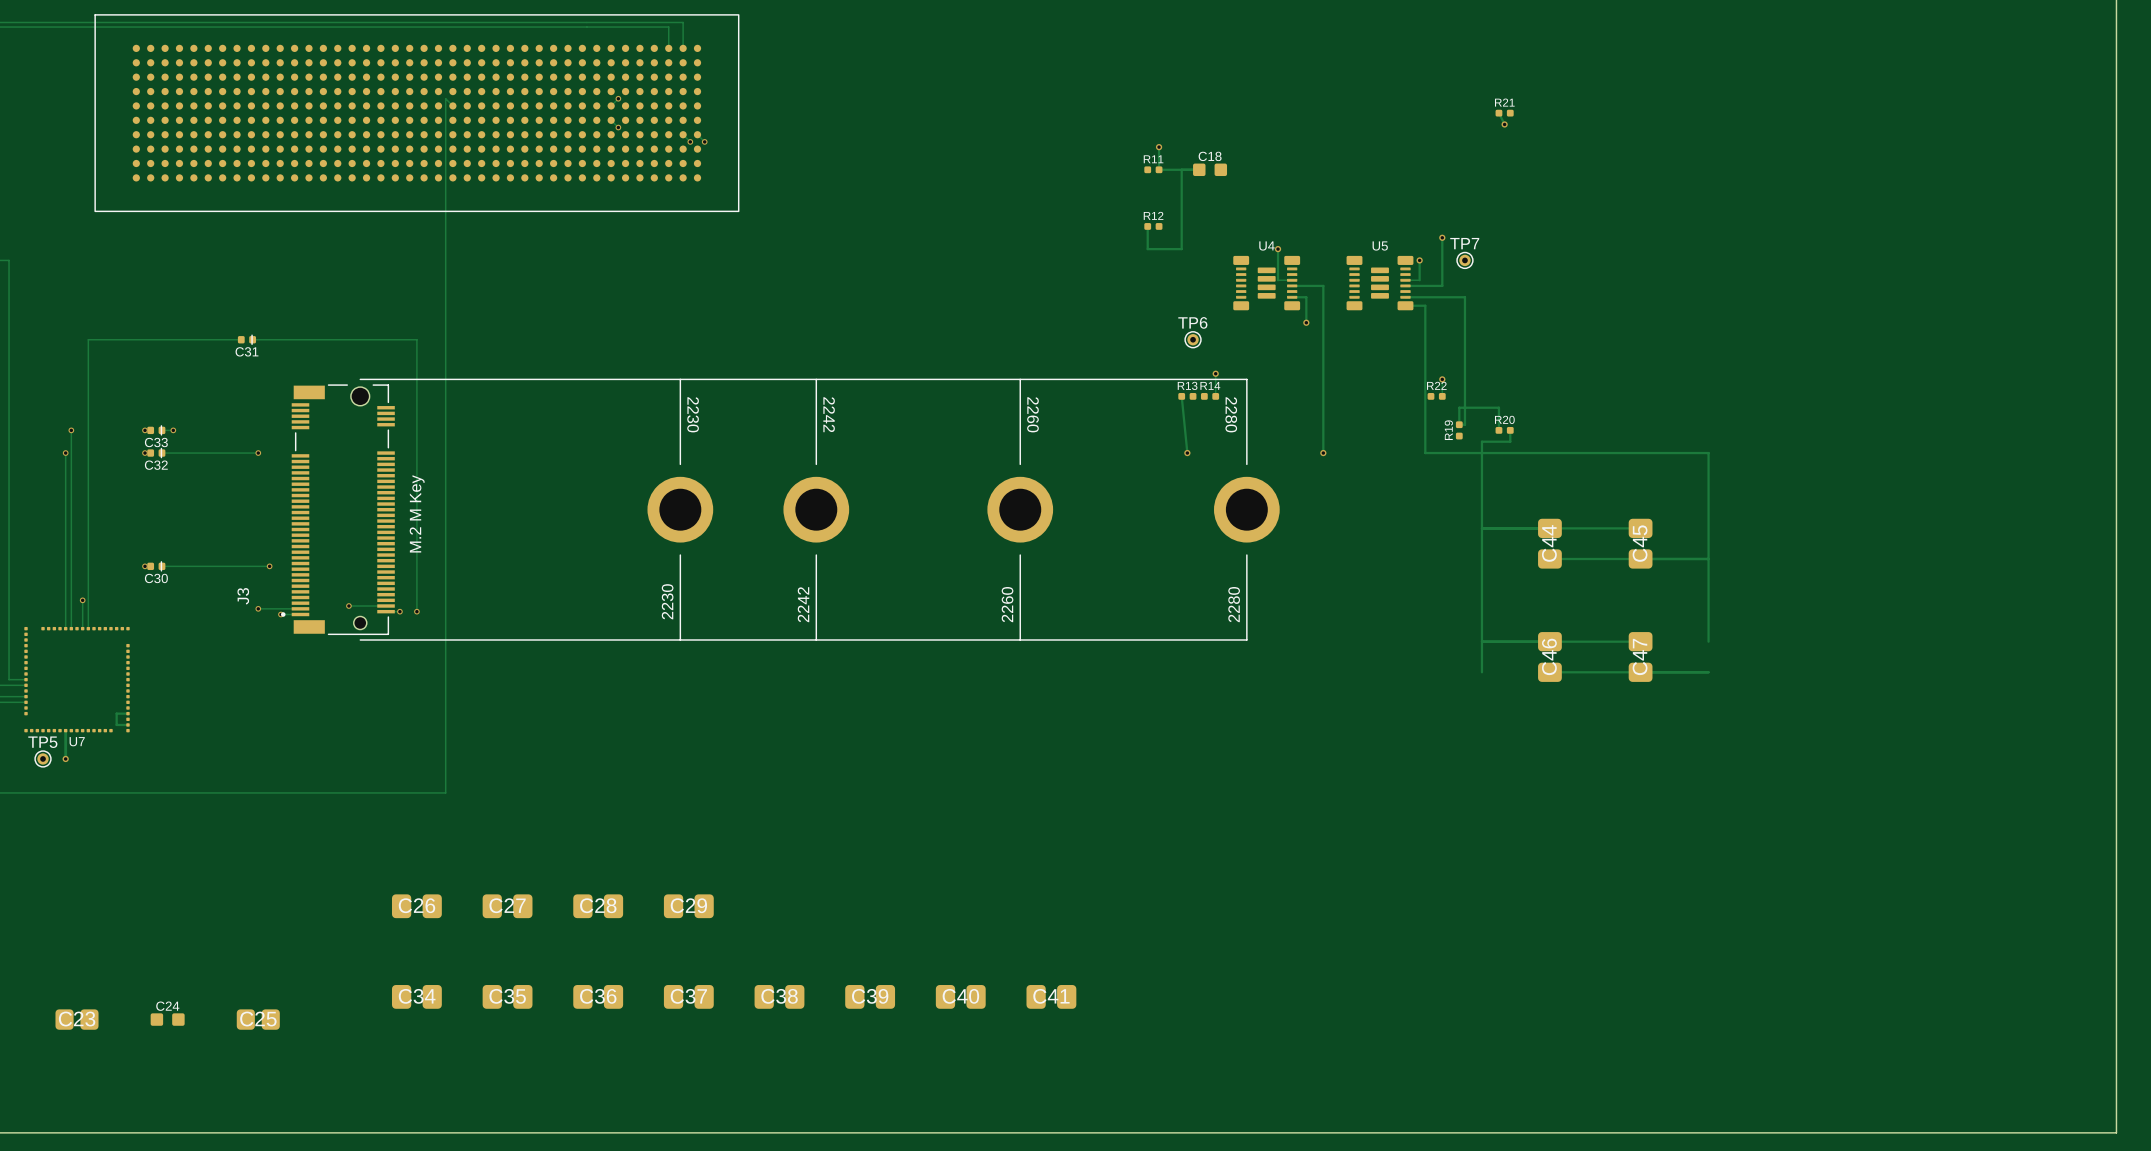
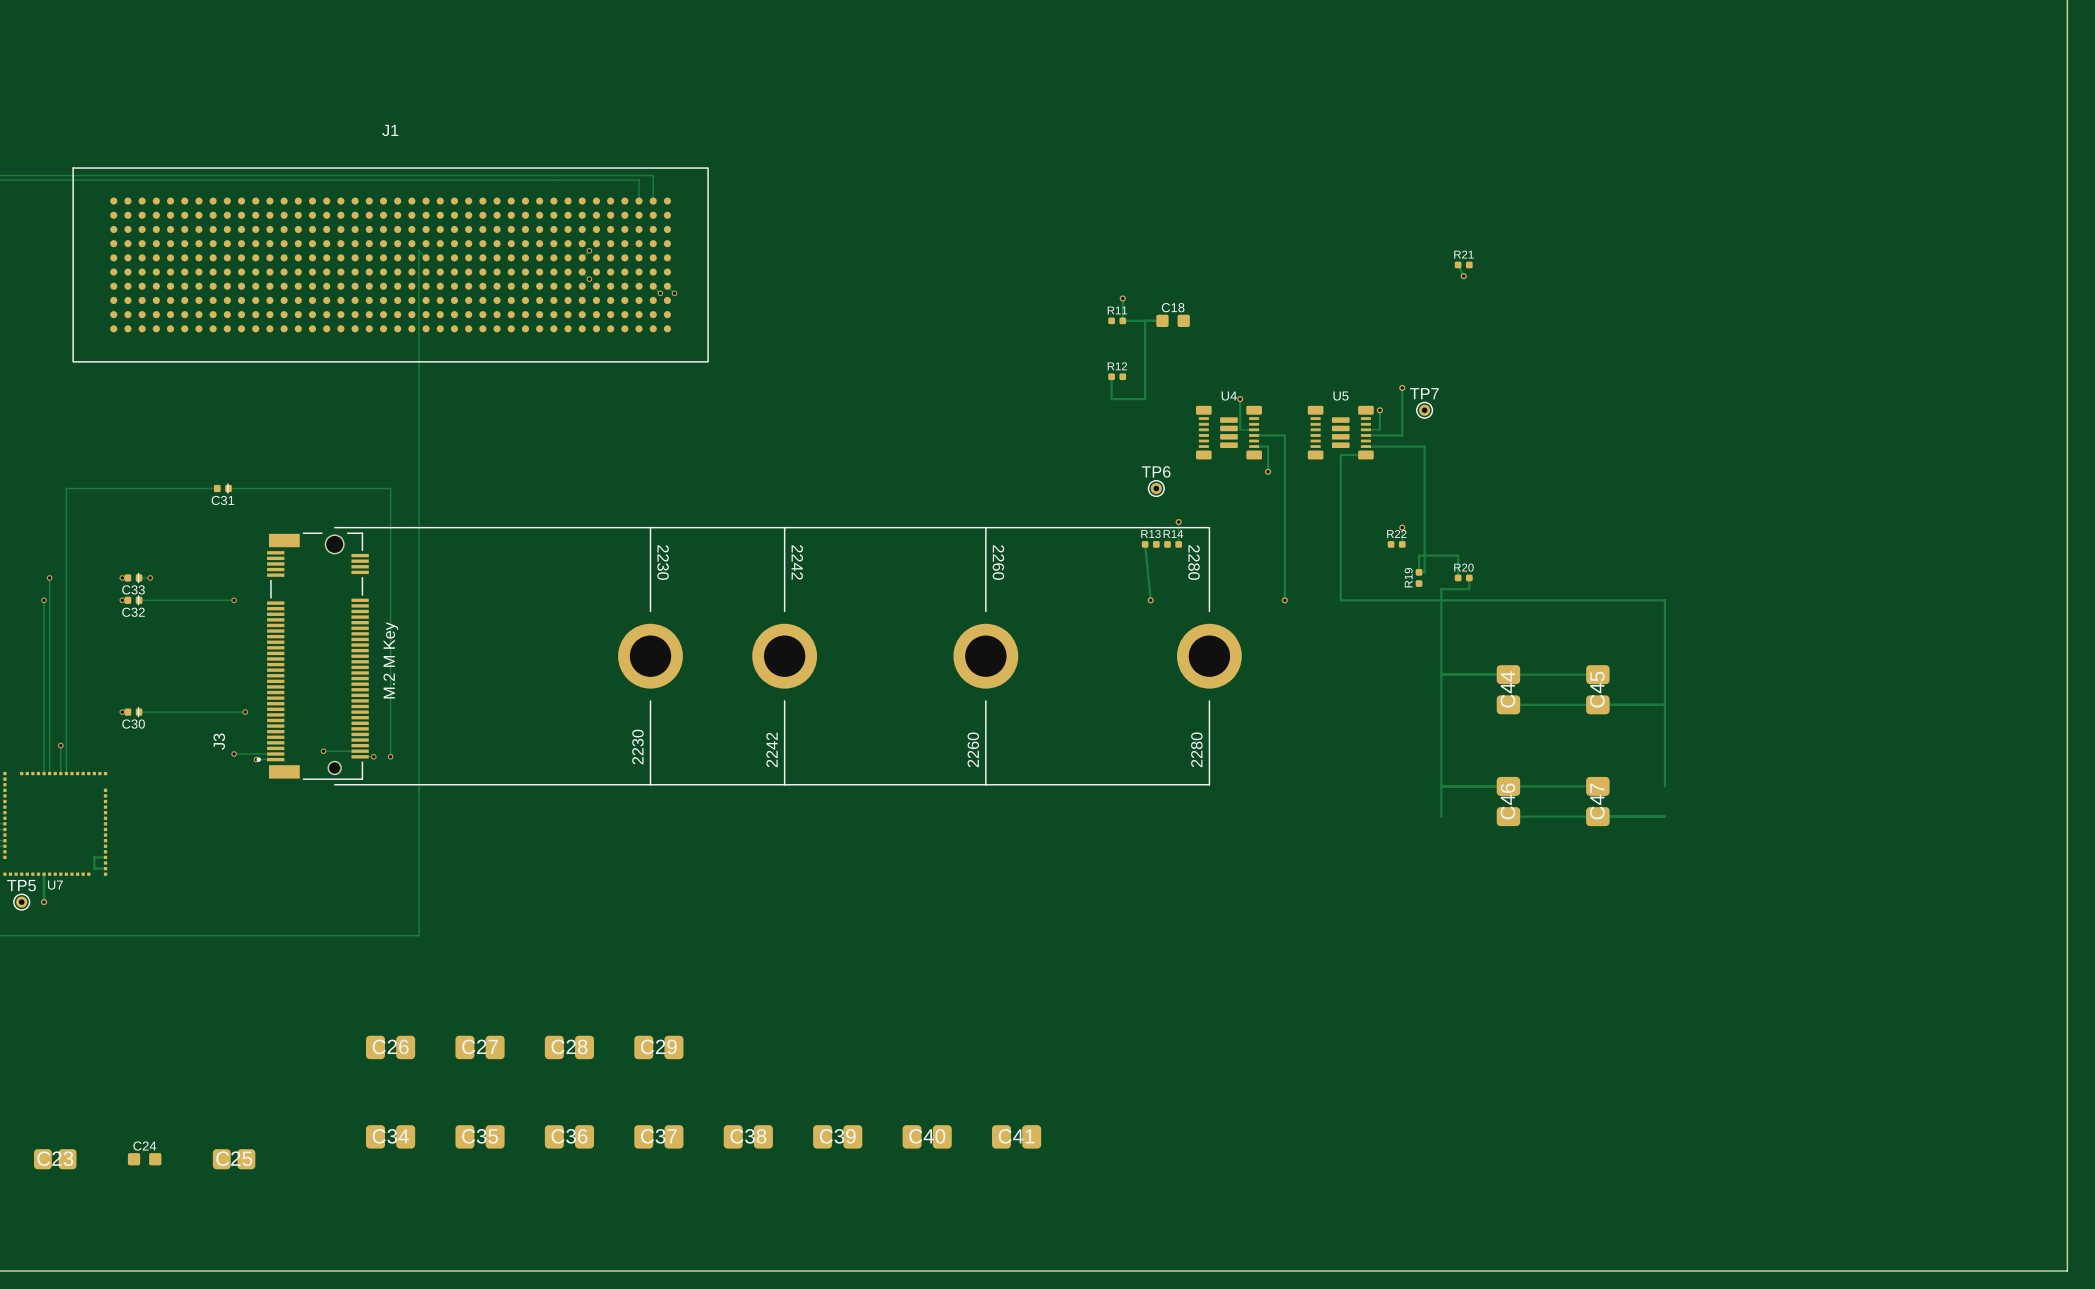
track: (1405, 305) (1425, 305) (1425, 453) -> (1365, 454) (1340, 454) (1340, 600) (1385, 600)

